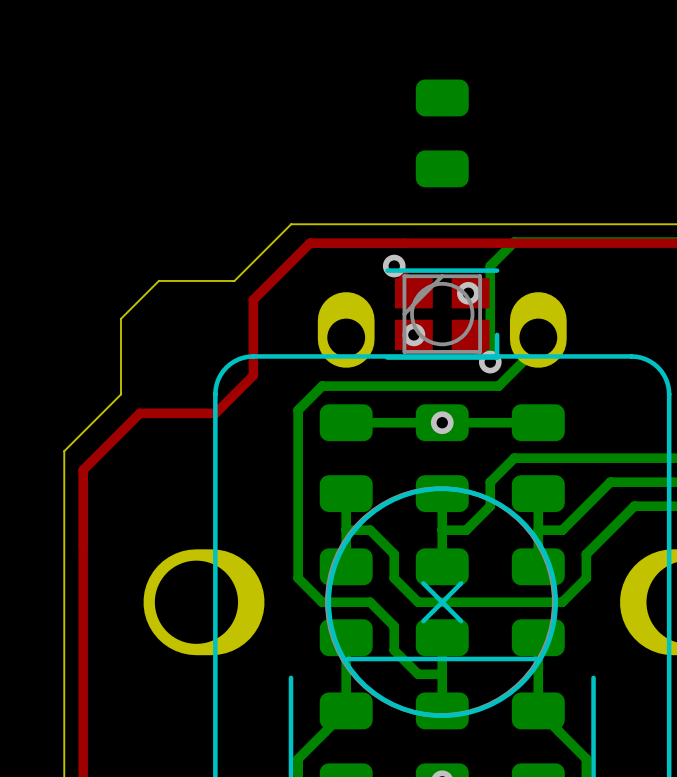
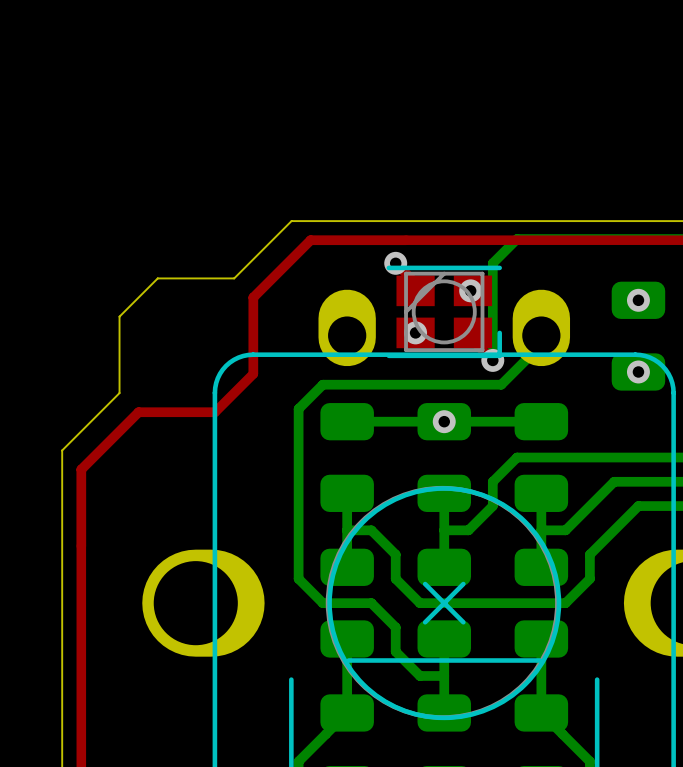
part position: (442, 133) -> (638, 336)
via: none -> (638, 300)
via: none -> (638, 371)

